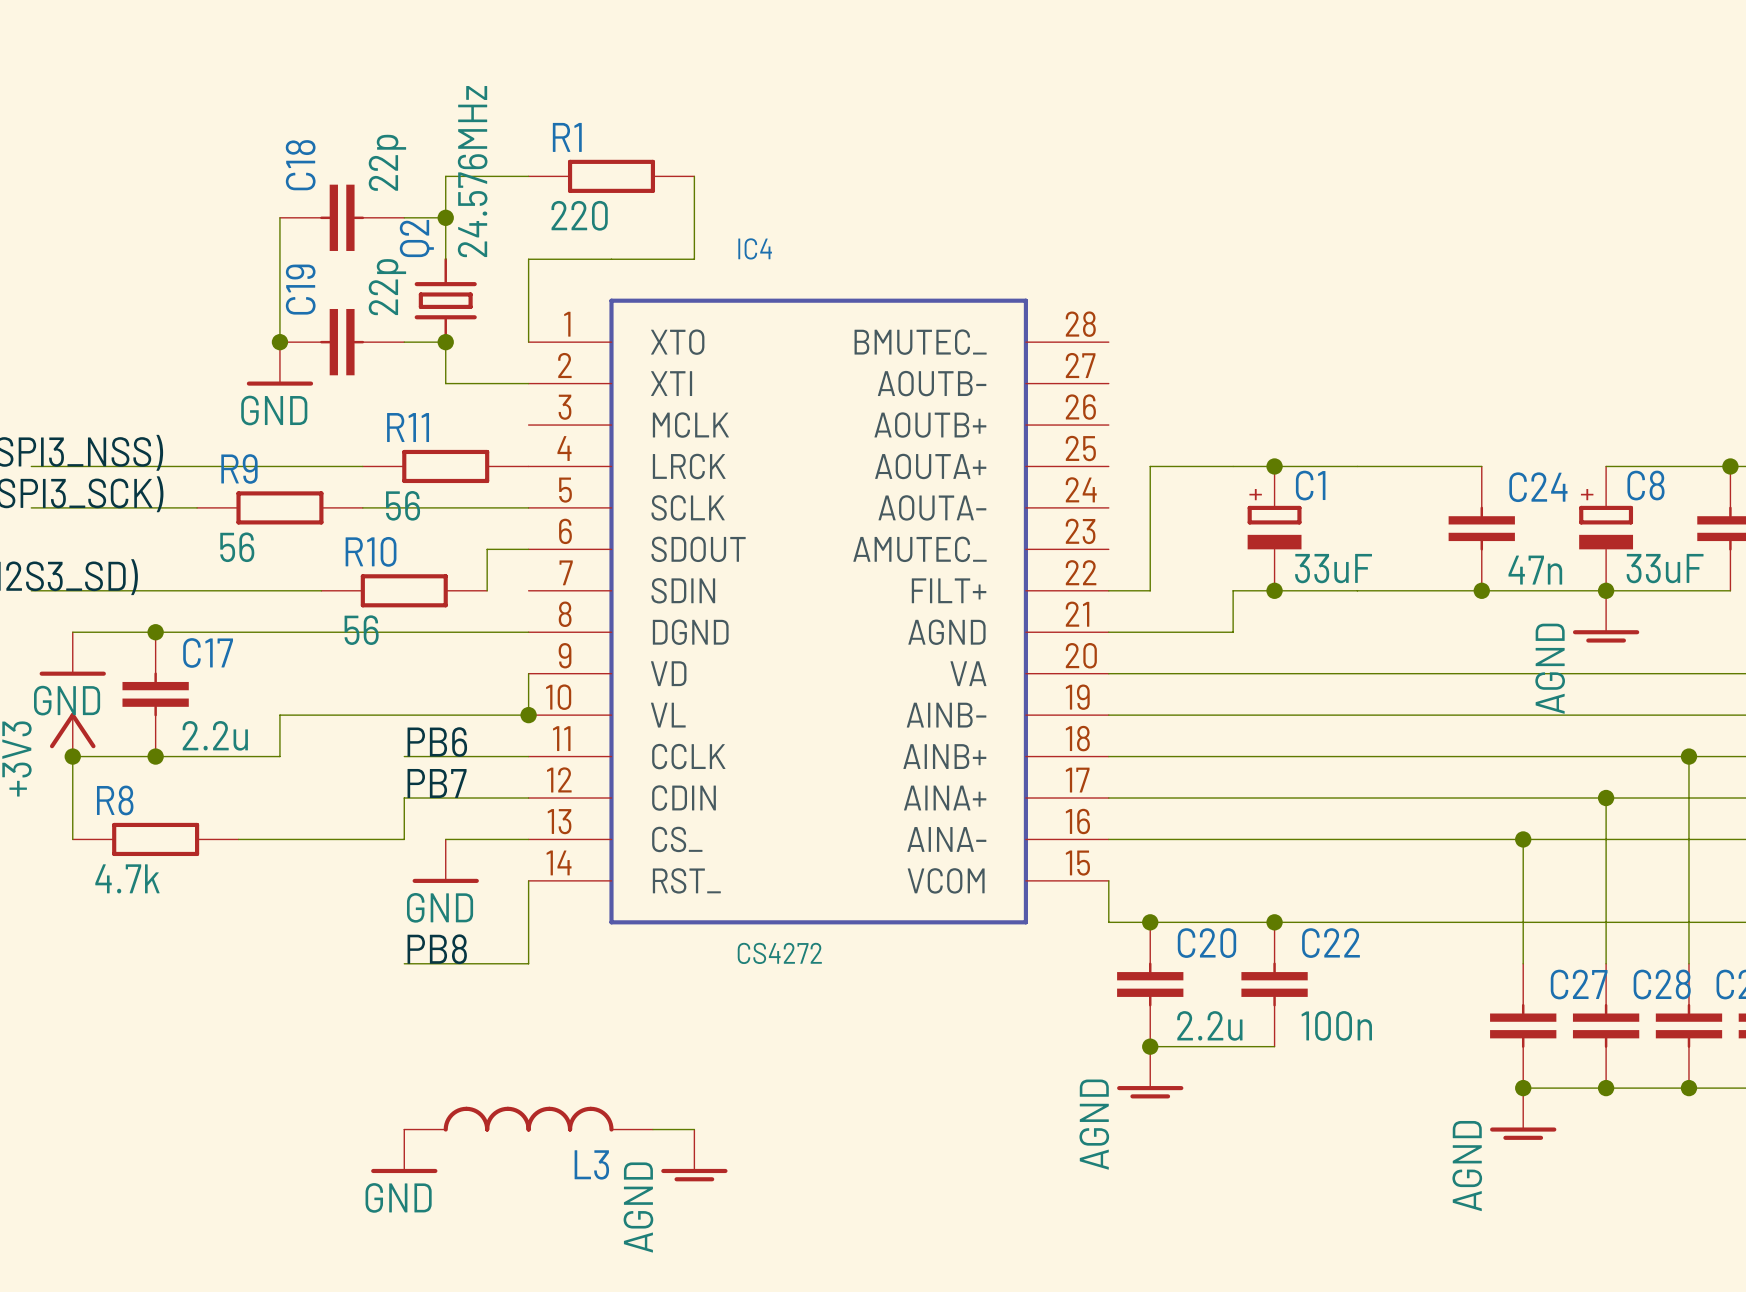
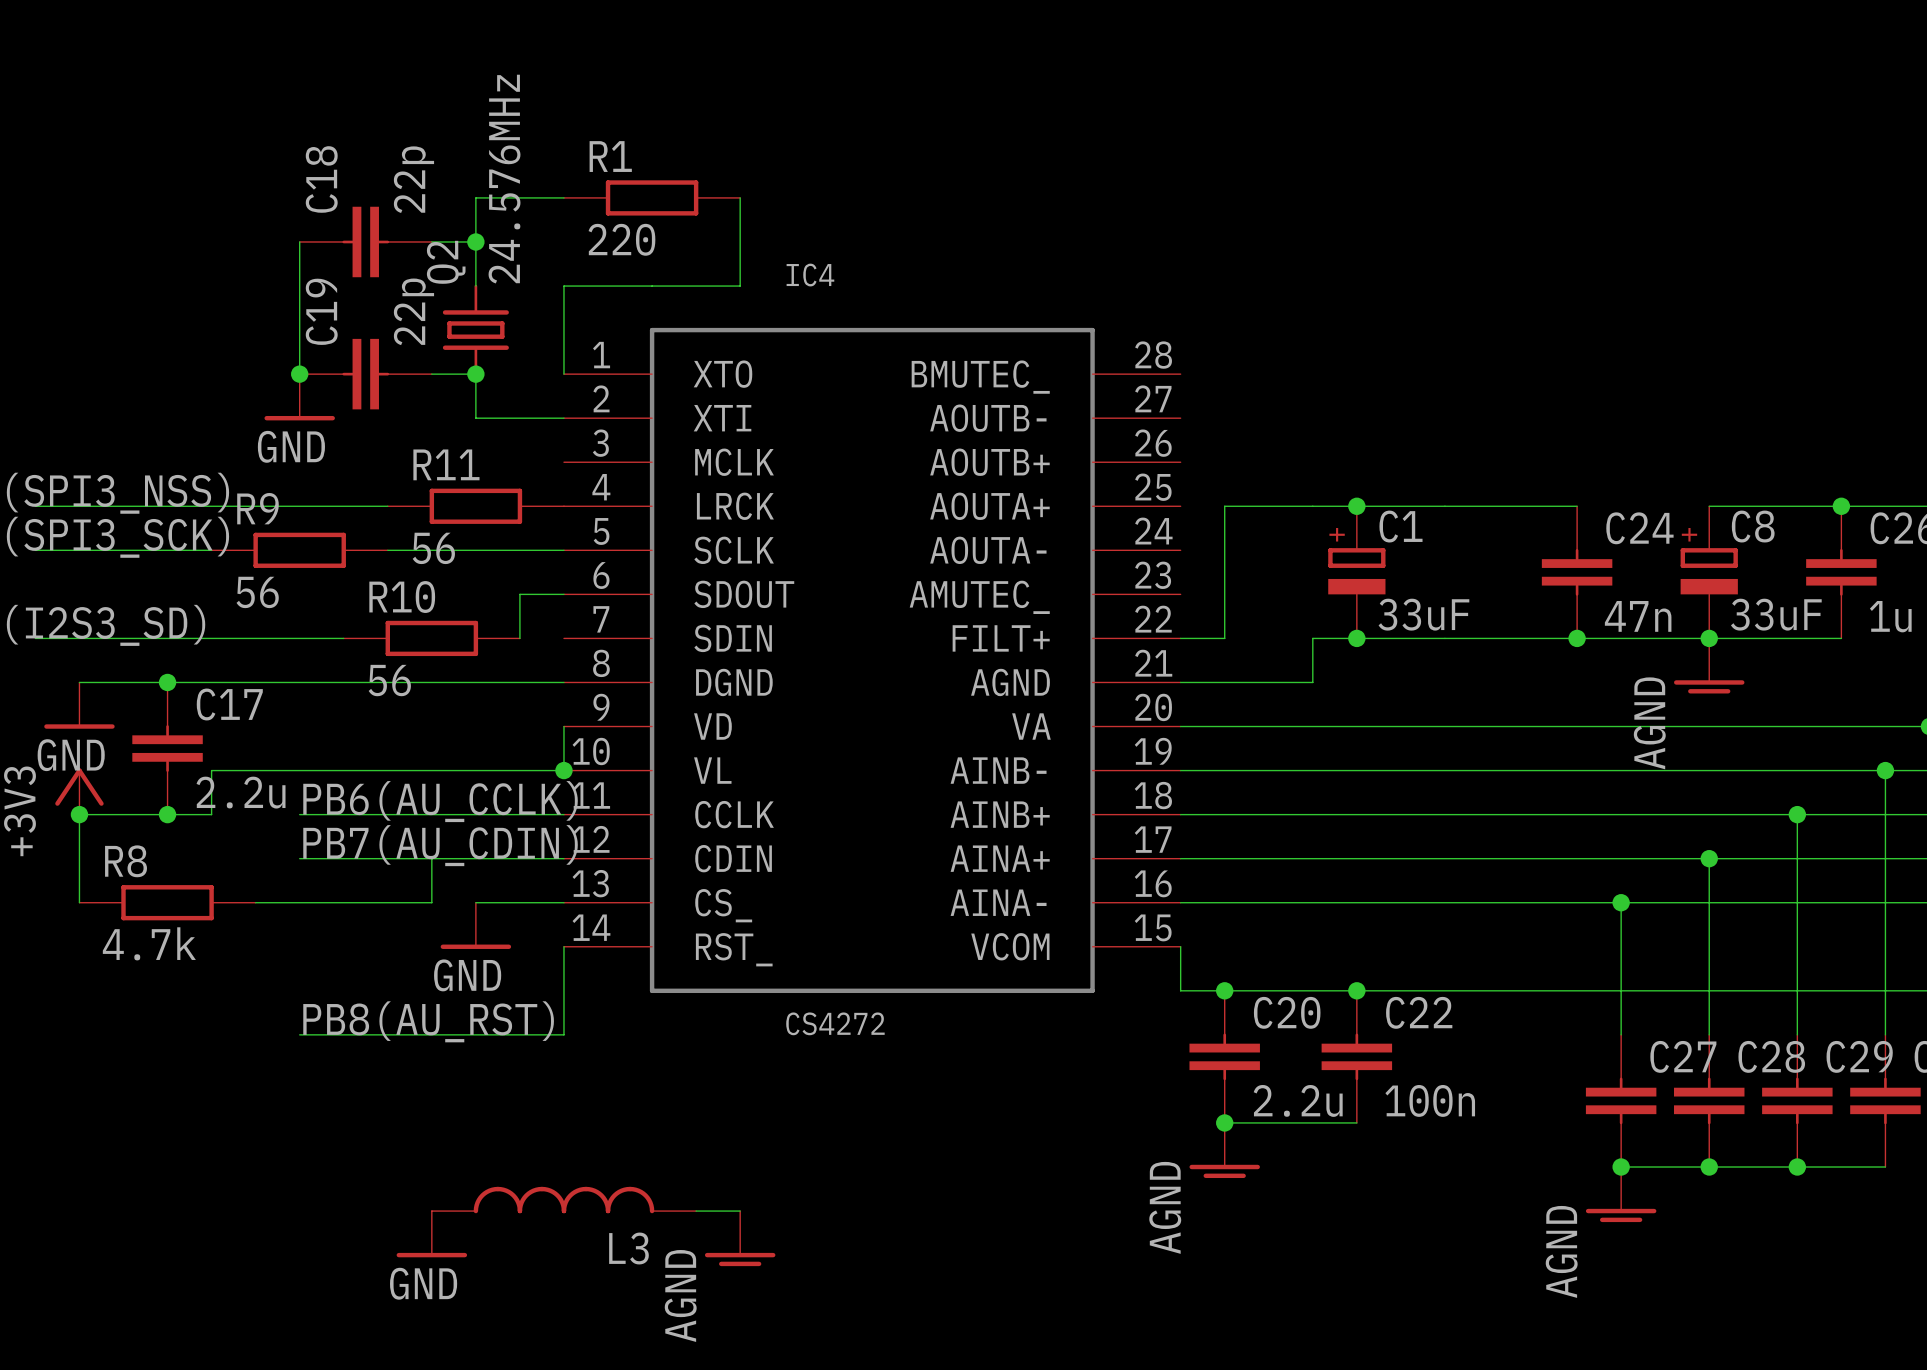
wire: (279, 715) (279, 756) (197, 756) -> (299, 770) (211, 770) (211, 814)
label: none -> PB6(AU_CCLK) (440, 801)
label: PB6 (437, 742) -> none
wire: none -> (299, 814) (431, 814)
label: PB7 (437, 783) -> none
label: none -> PB7(AU_CDIN) (440, 845)
wire: none -> (299, 858) (431, 858)
label: PB8 (437, 949) -> none
label: none -> PB8(AU_RST) (428, 1021)
wire: none -> (299, 1034) (431, 1034)

